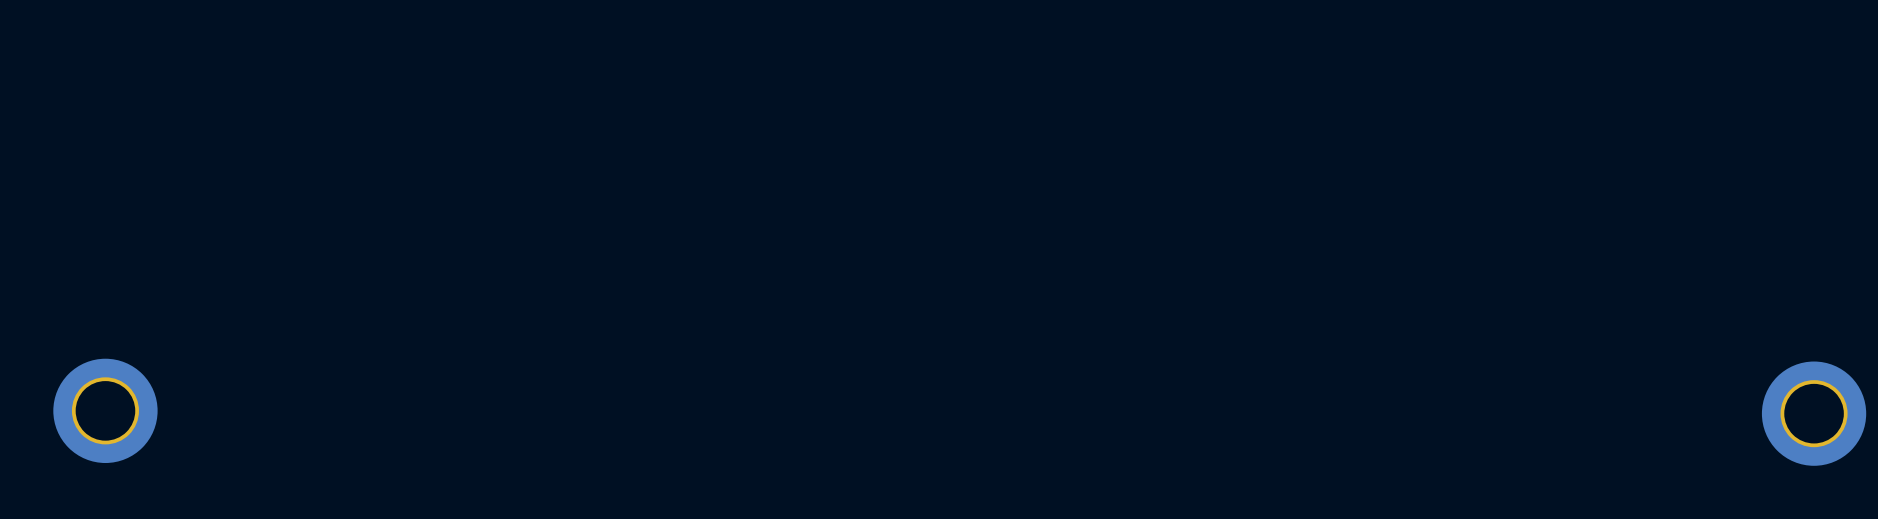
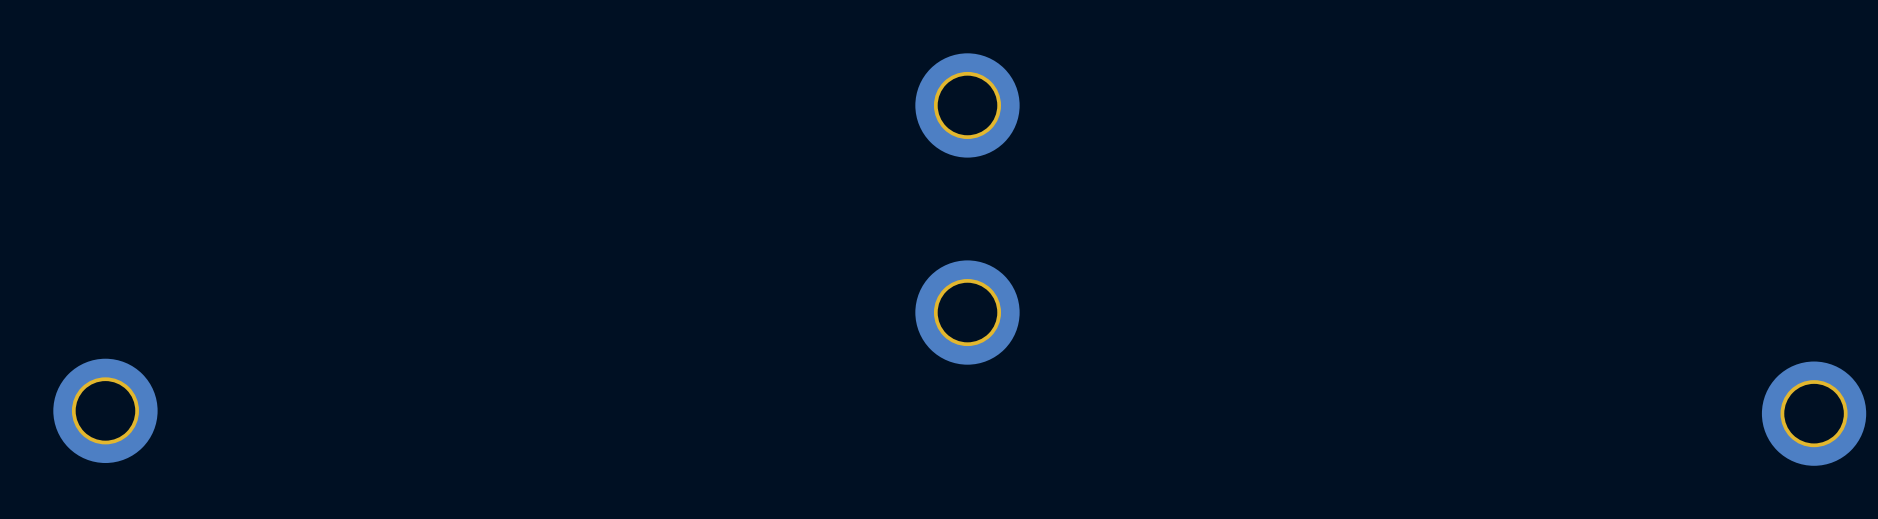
part: none -> (967, 105)
part: none -> (967, 312)

